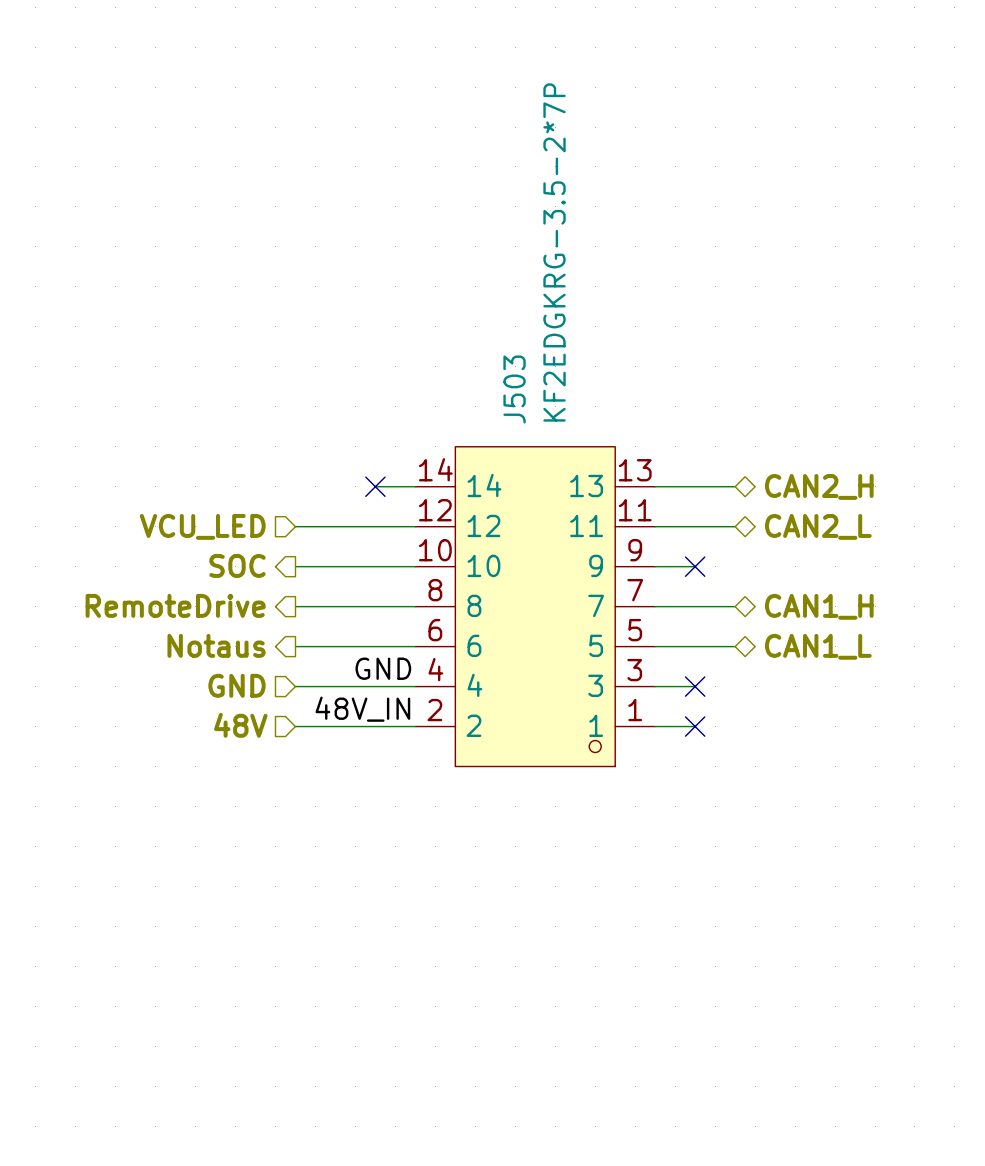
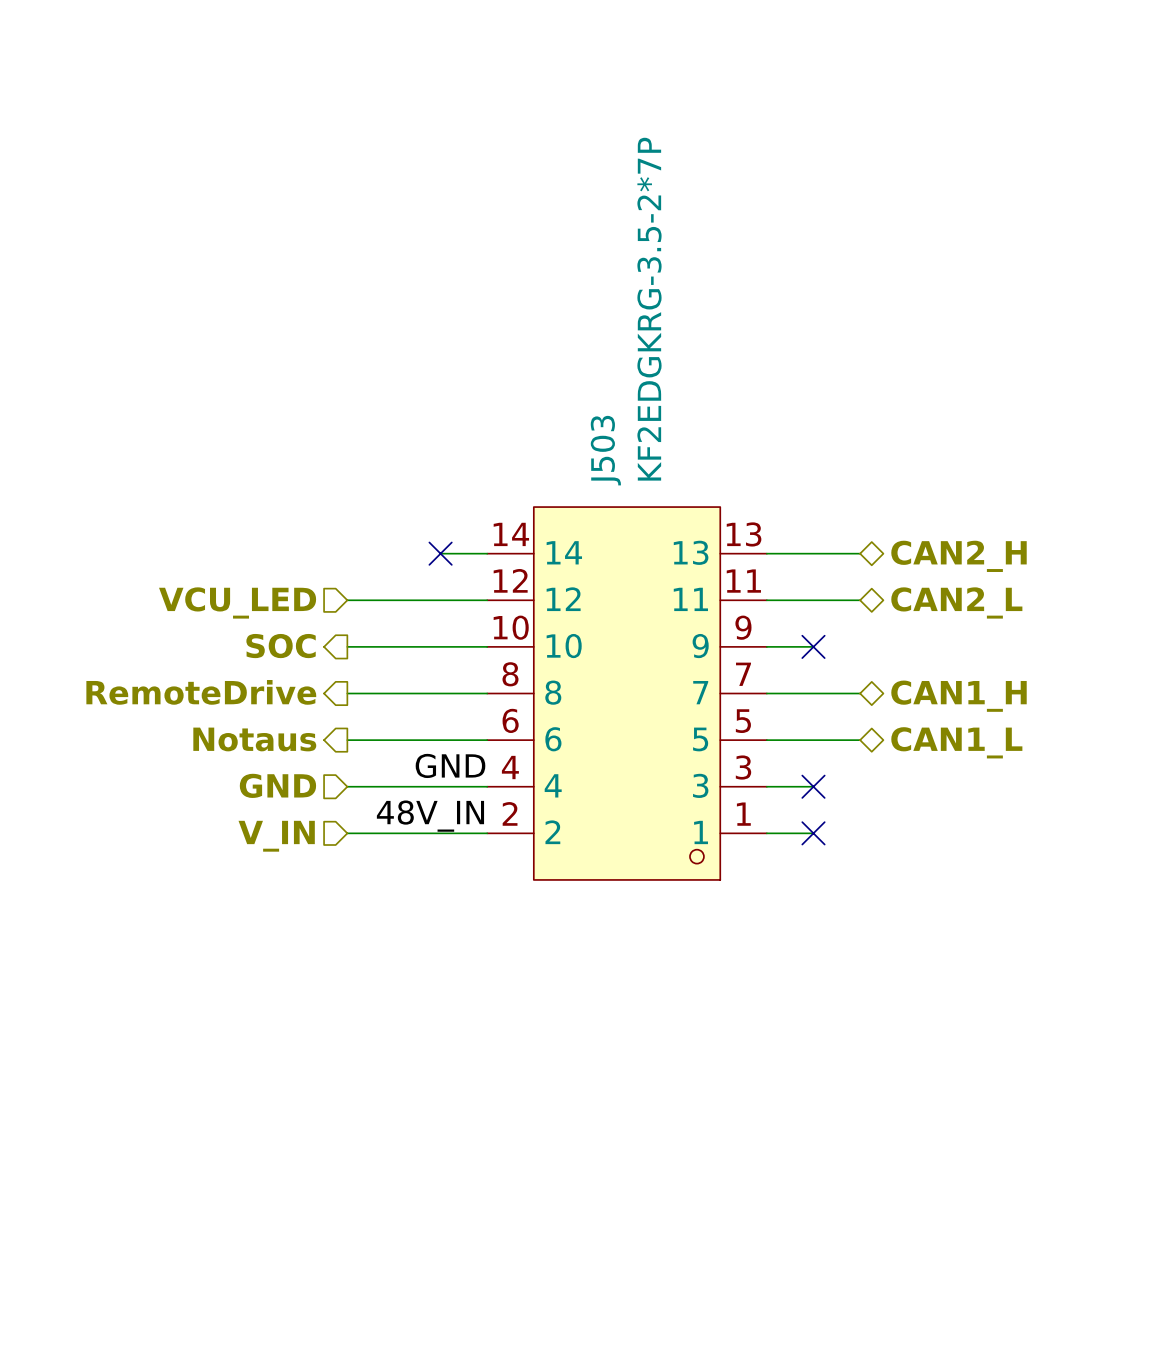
hierarchical label: 48V (240, 725) -> V_IN (276, 836)

